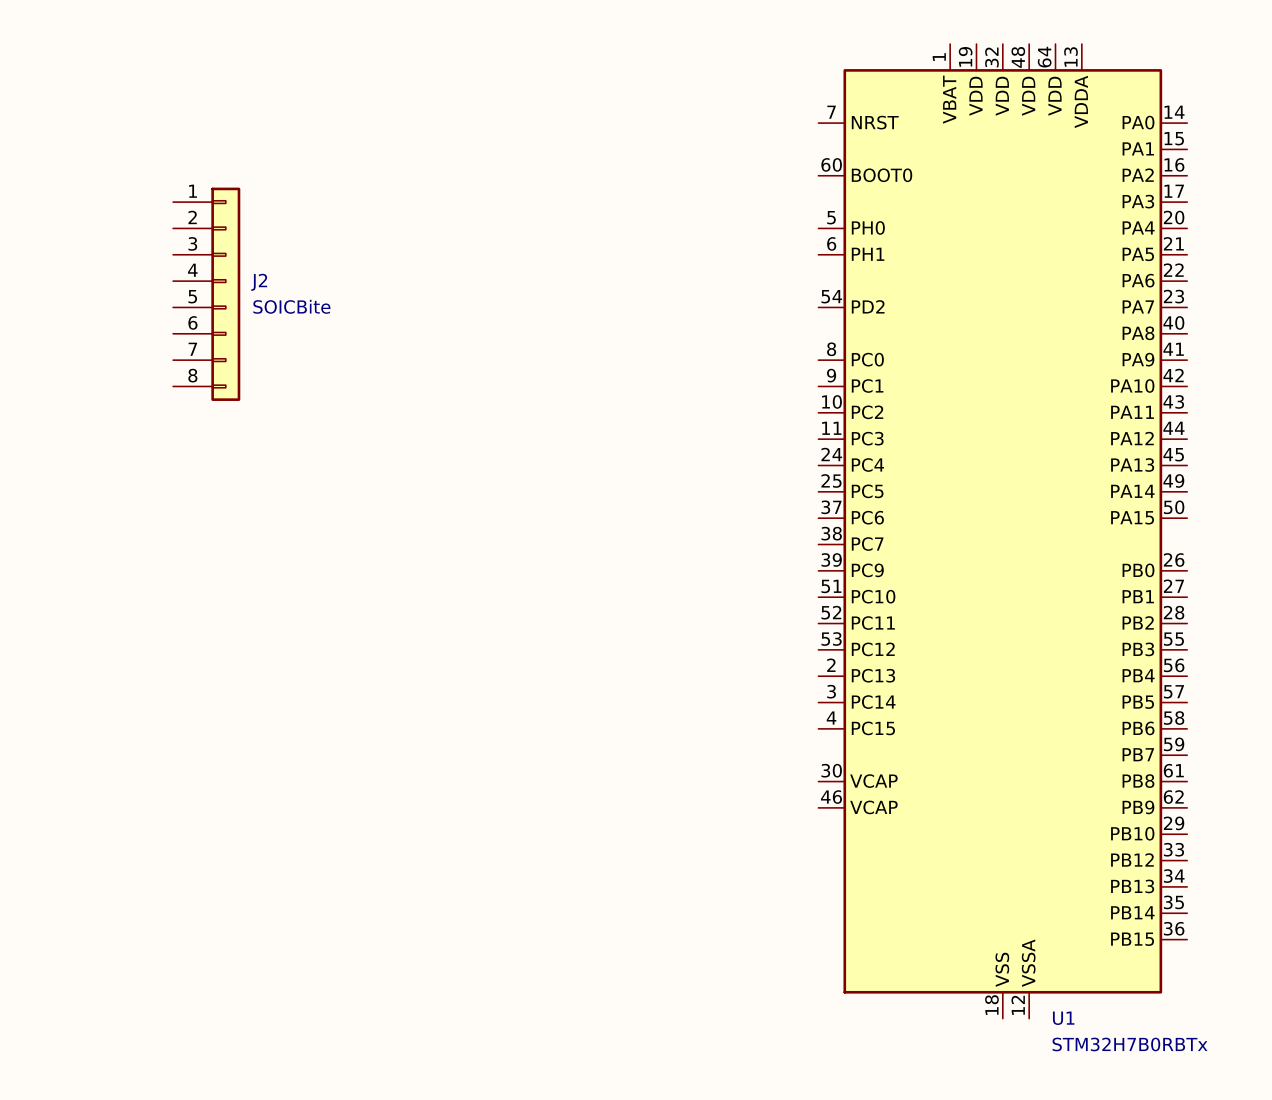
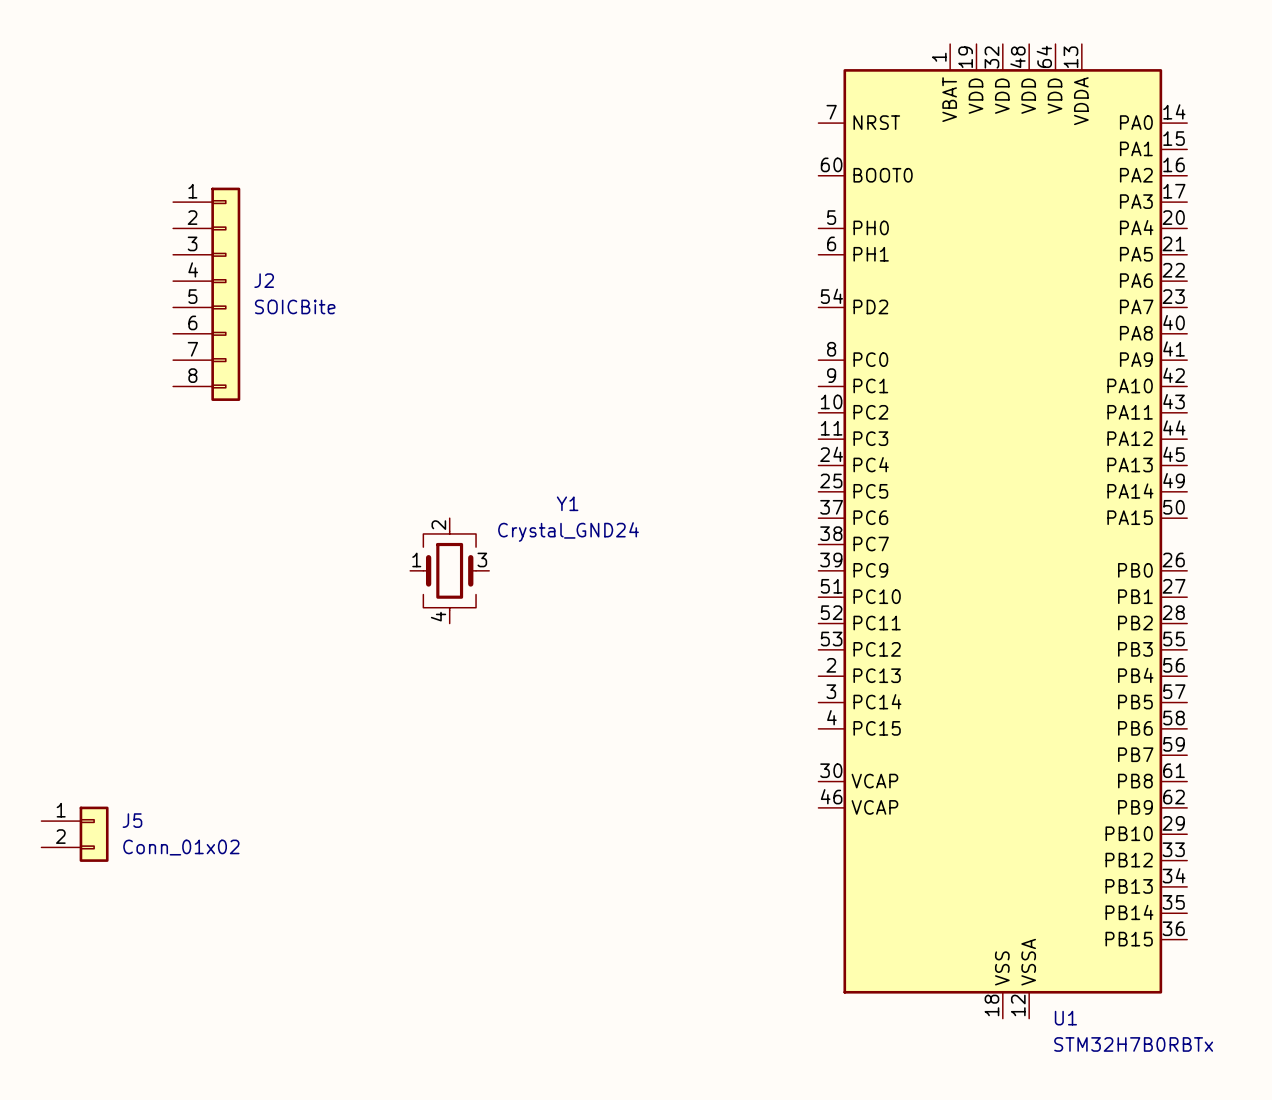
Y1: none -> Crystal_GND24 (449, 570)
J5: none -> Conn_01x02 (75, 834)

